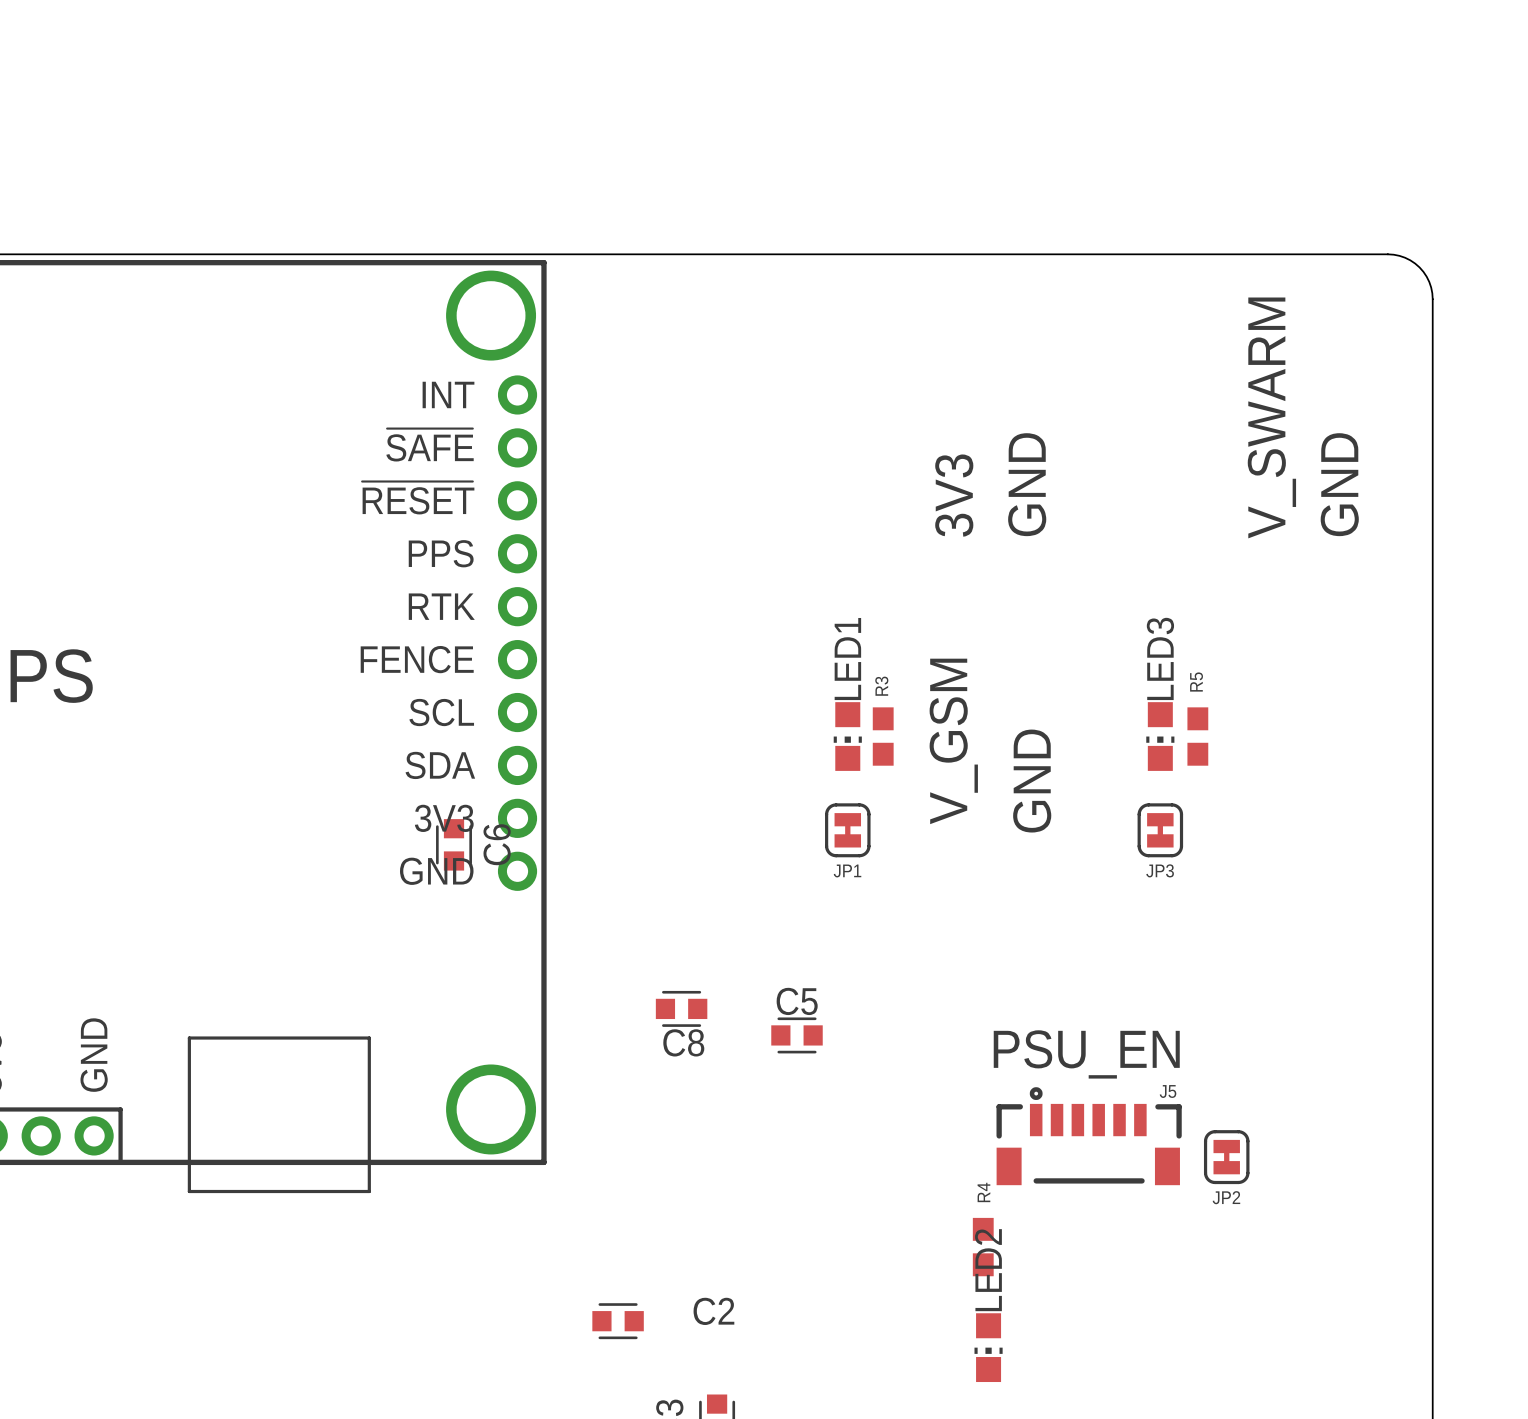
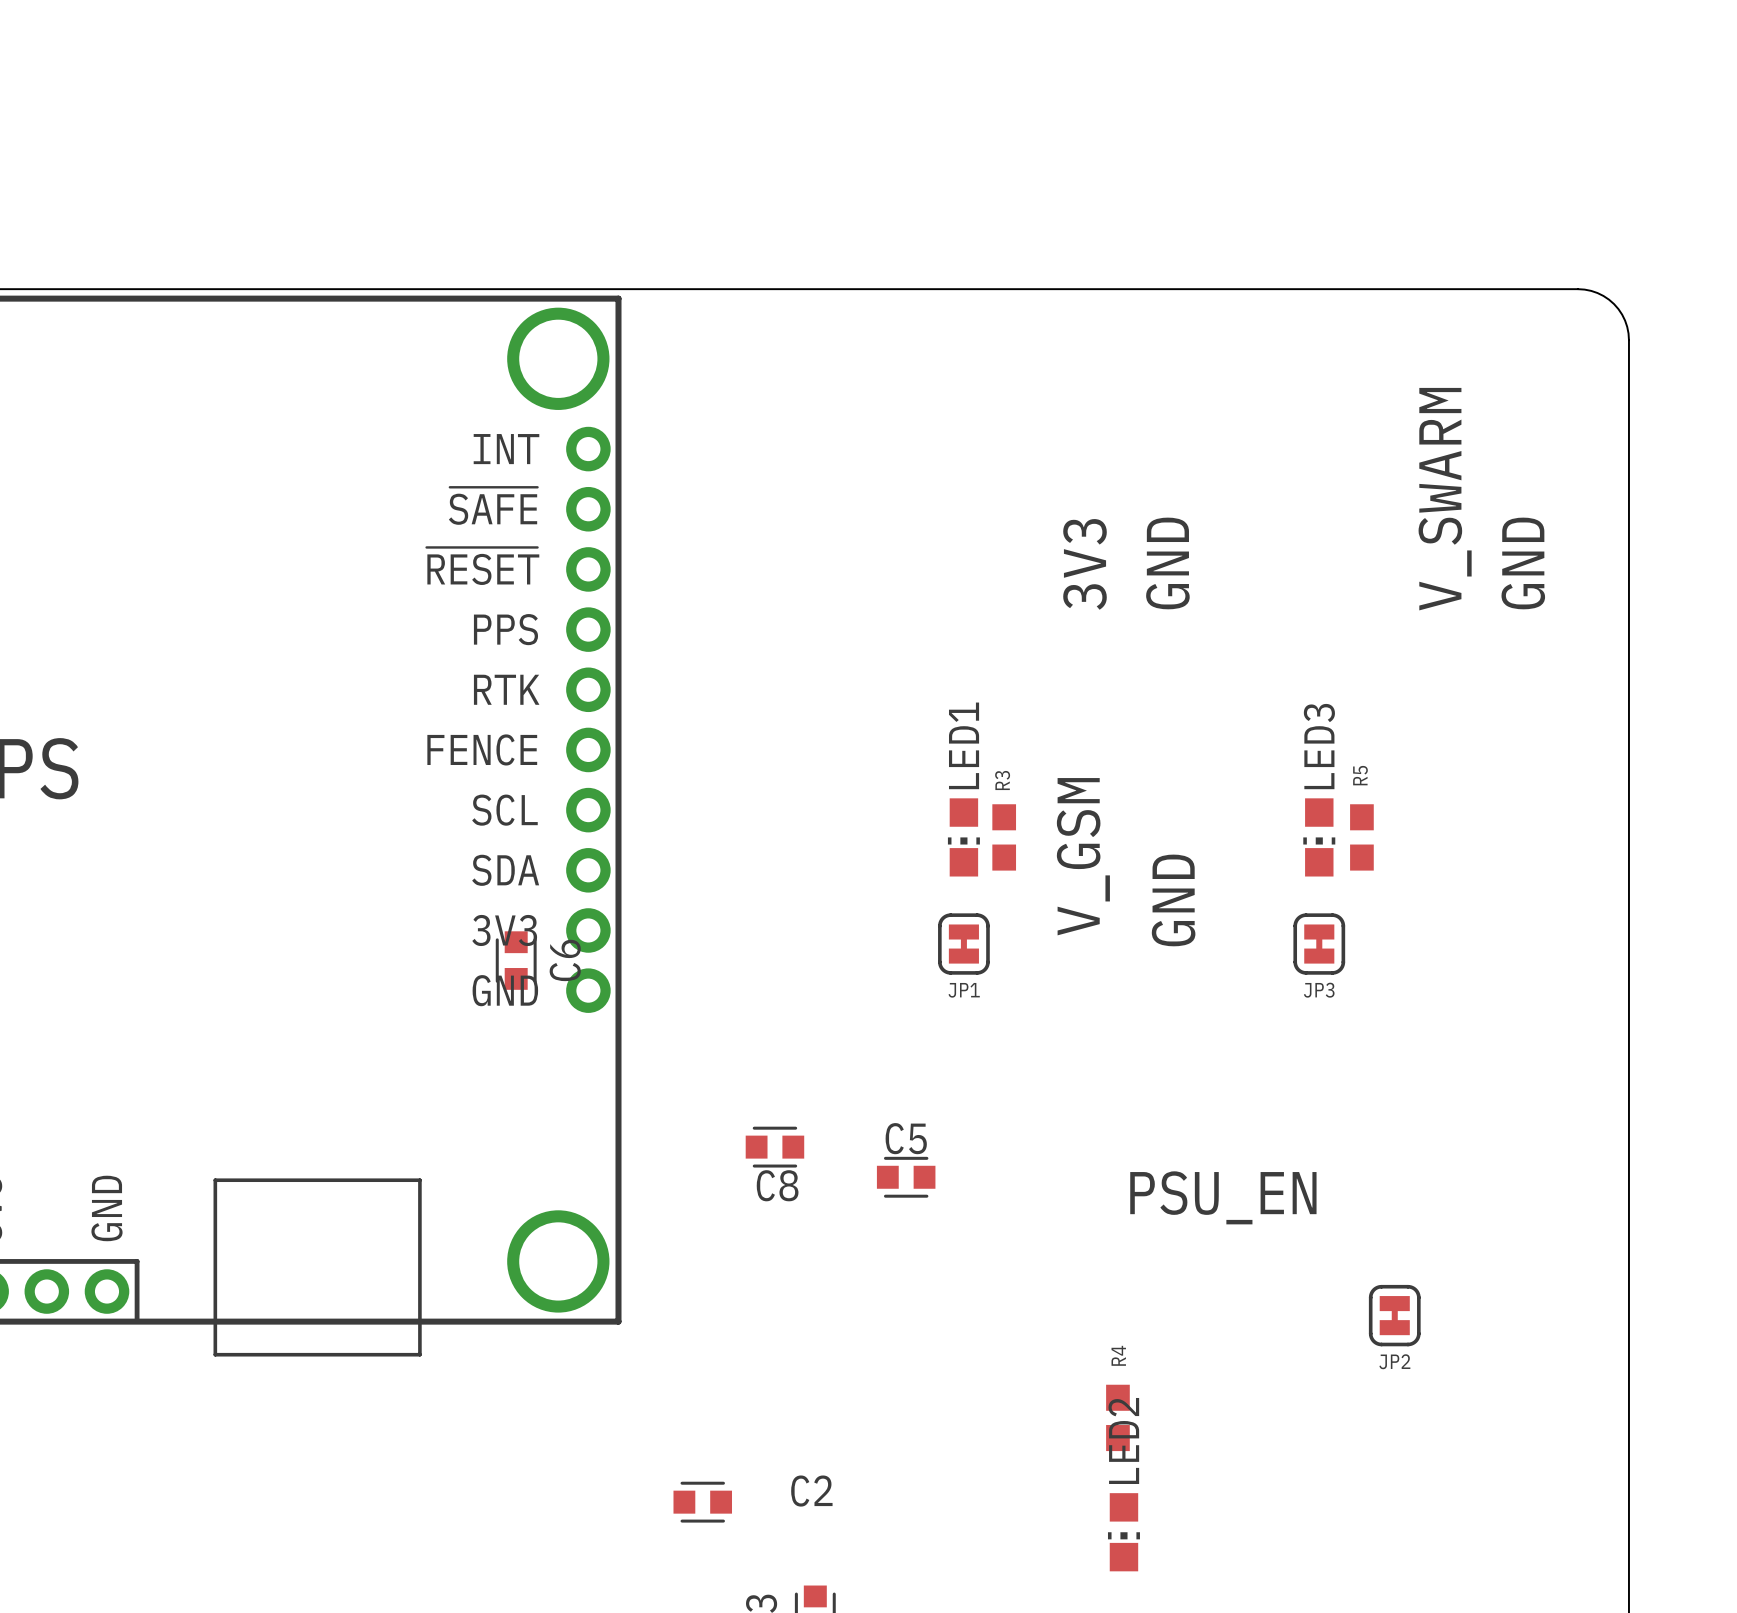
J5: (1089, 1136) -> none

